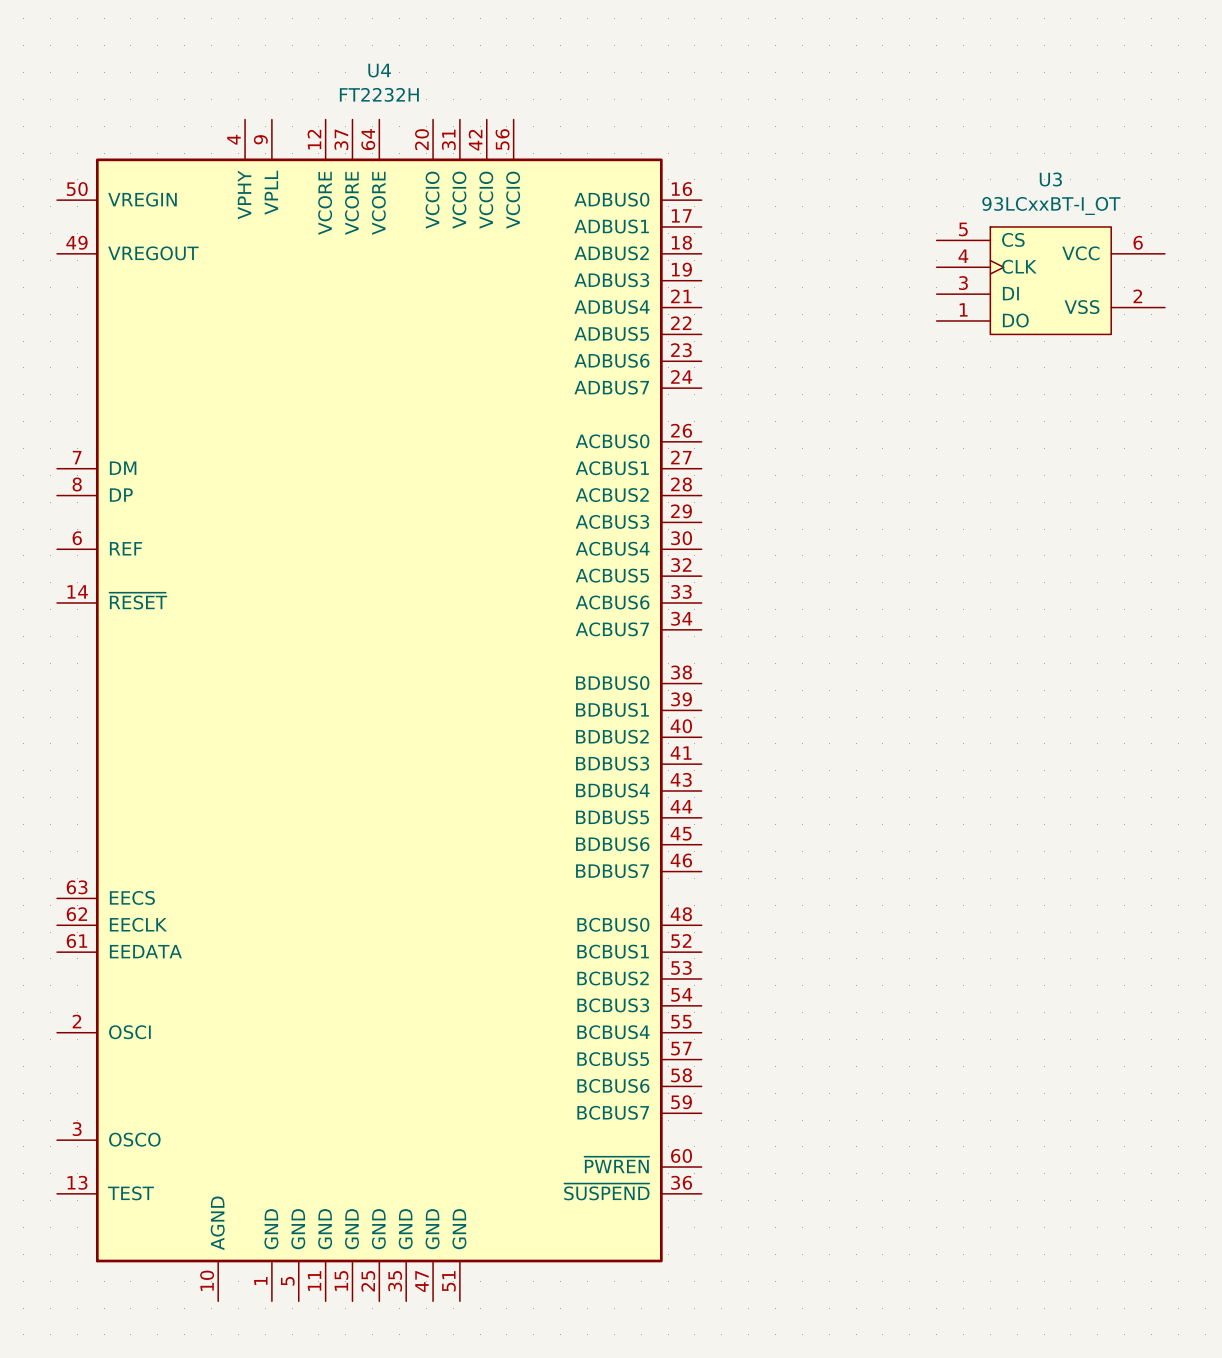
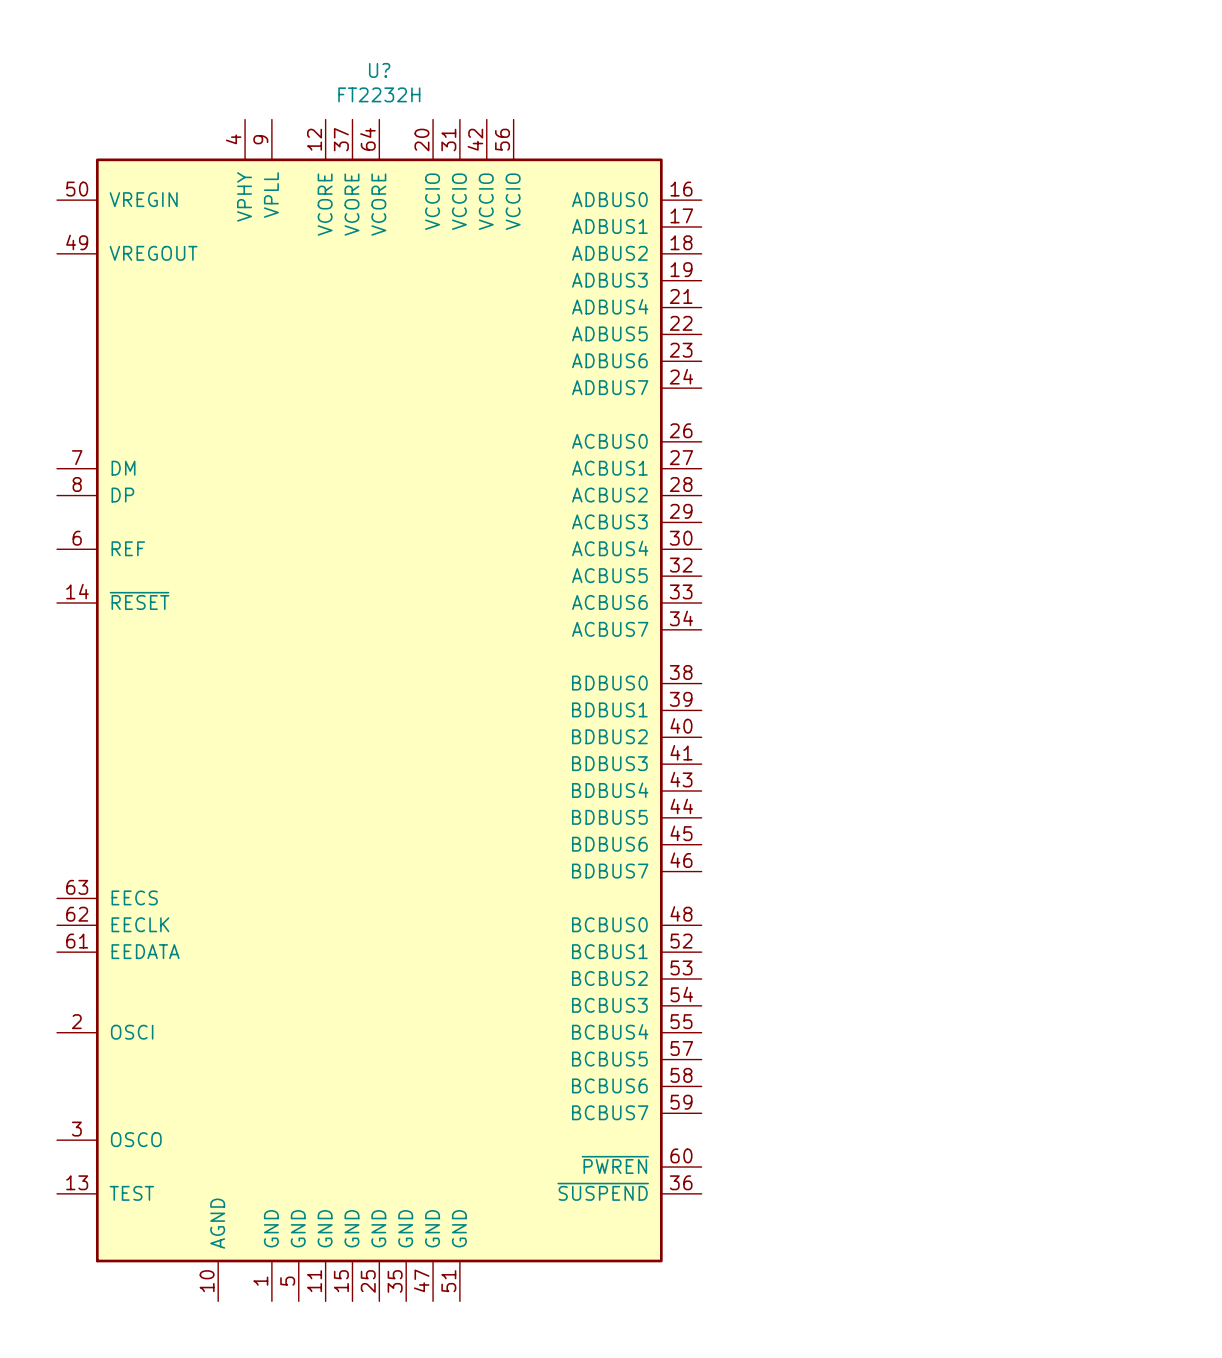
U4 name: U4 (379, 70) -> U? (379, 70)
U3: 93LCxxBT-I_OT (1050, 280) -> none

